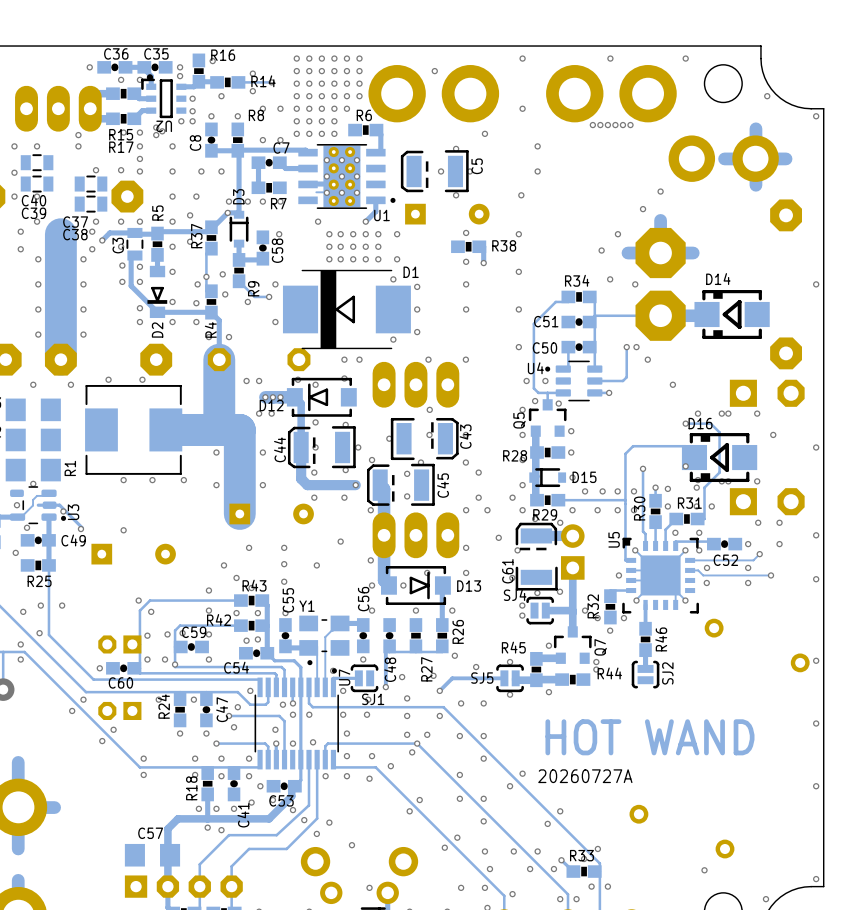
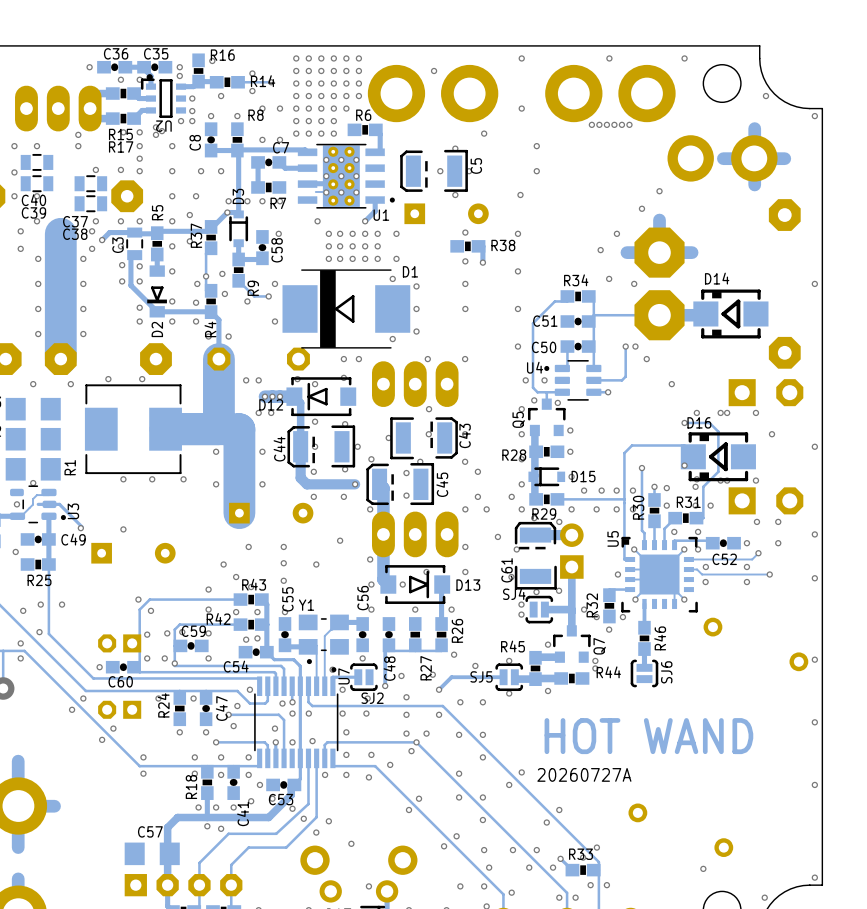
via: (63, 511) -> none
via: (27, 527) -> none
SJ2 name: SJ2 (667, 673) -> SJ6 (666, 672)
SJ1 name: SJ1 (373, 699) -> SJ2 (372, 698)

